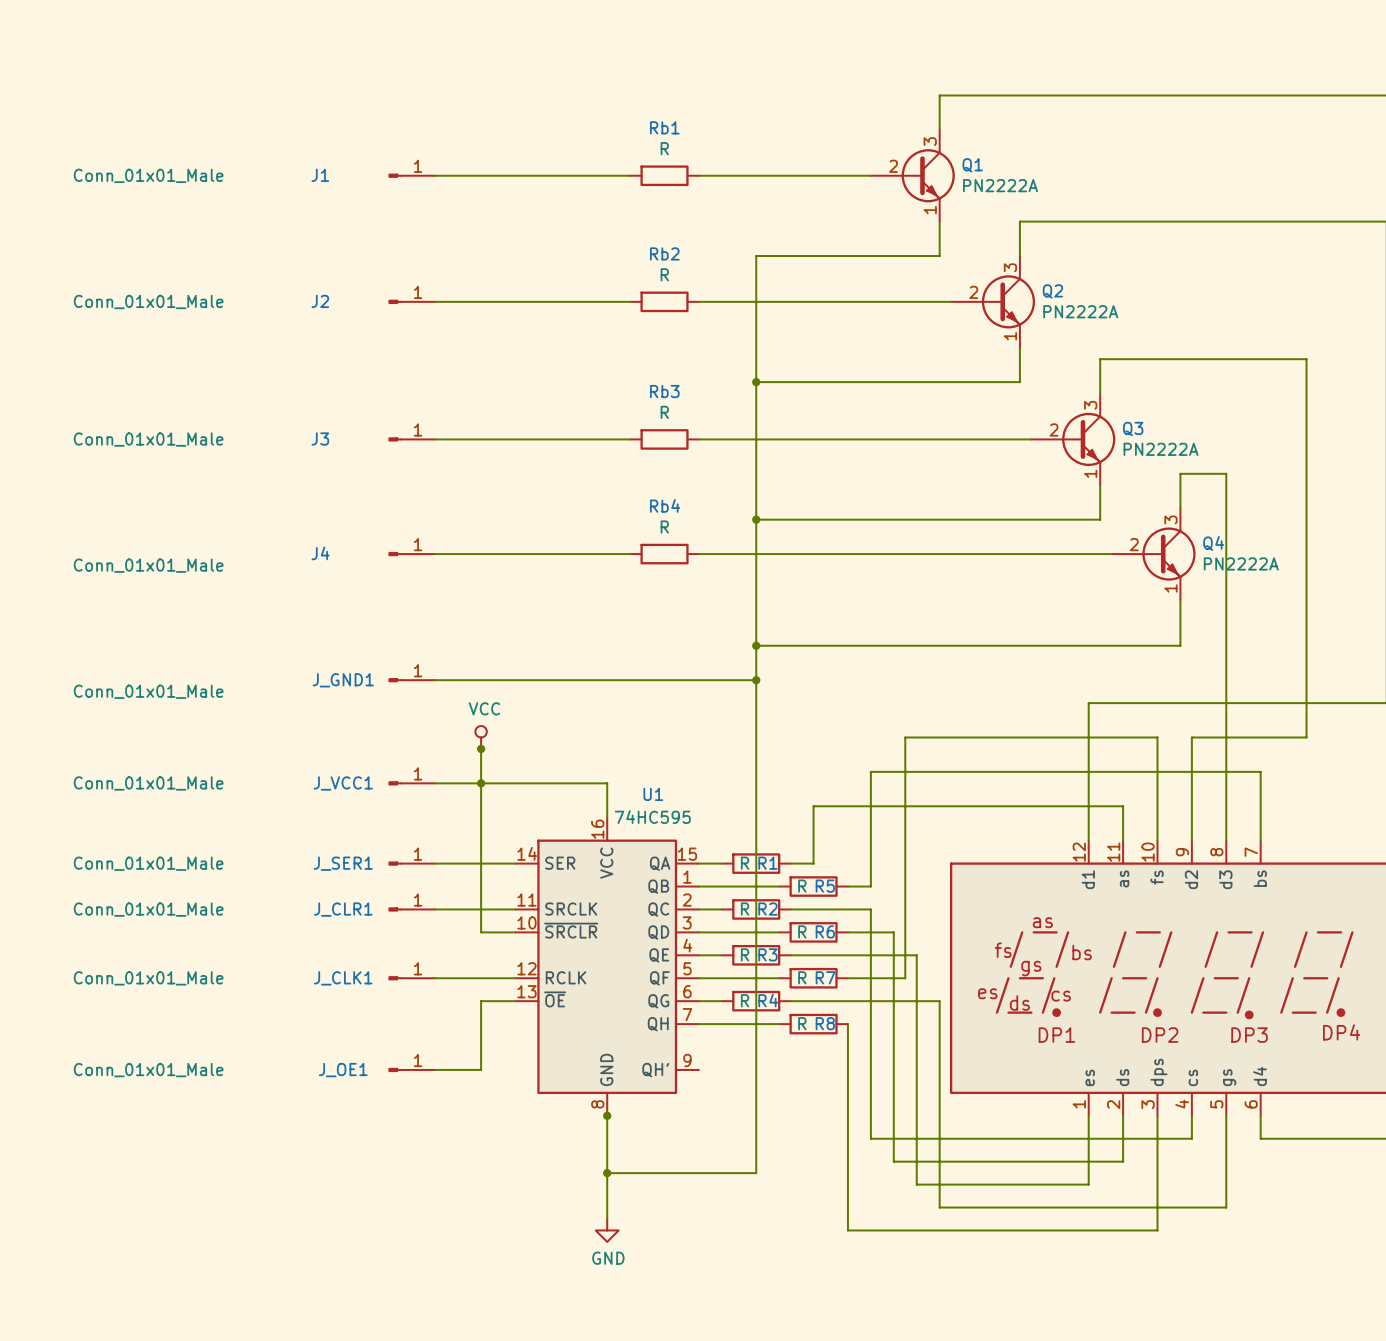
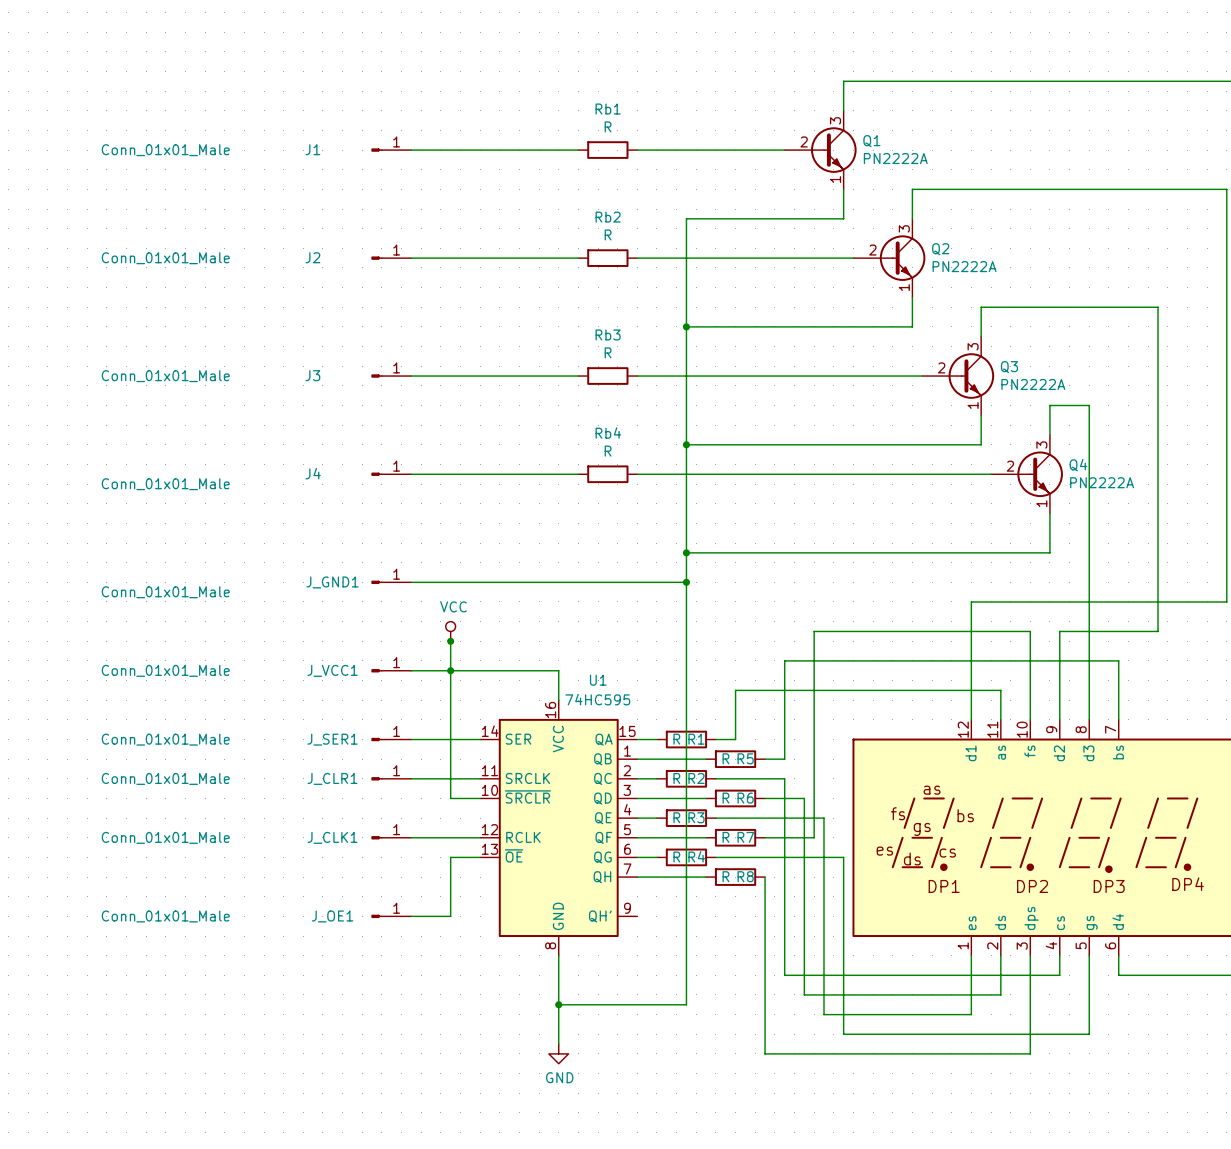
junction: (607, 1115) -> none

